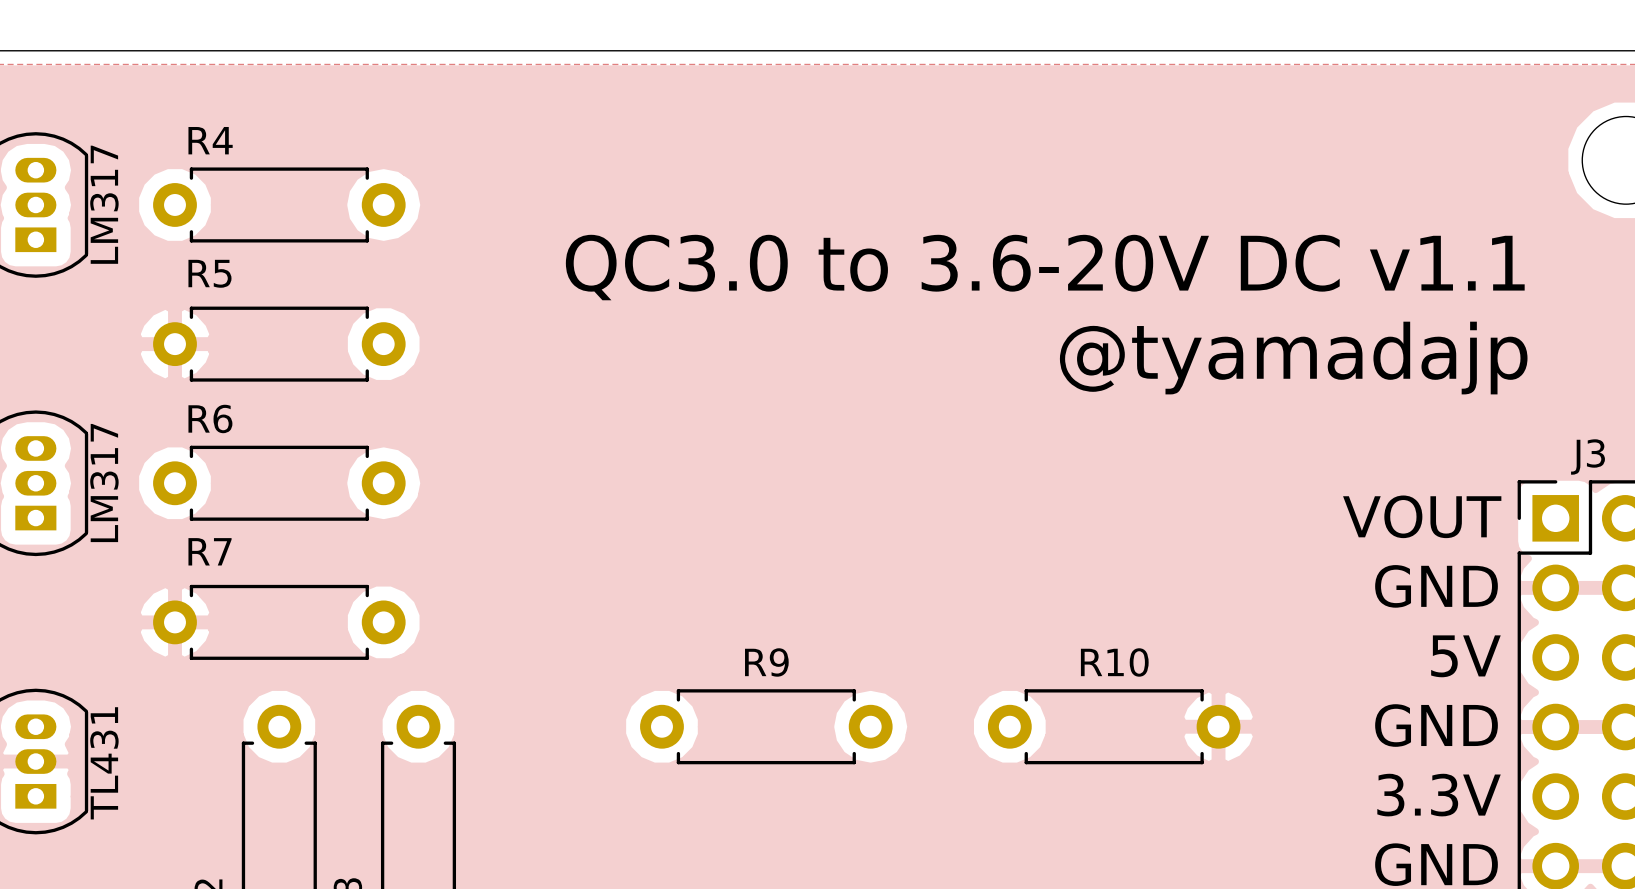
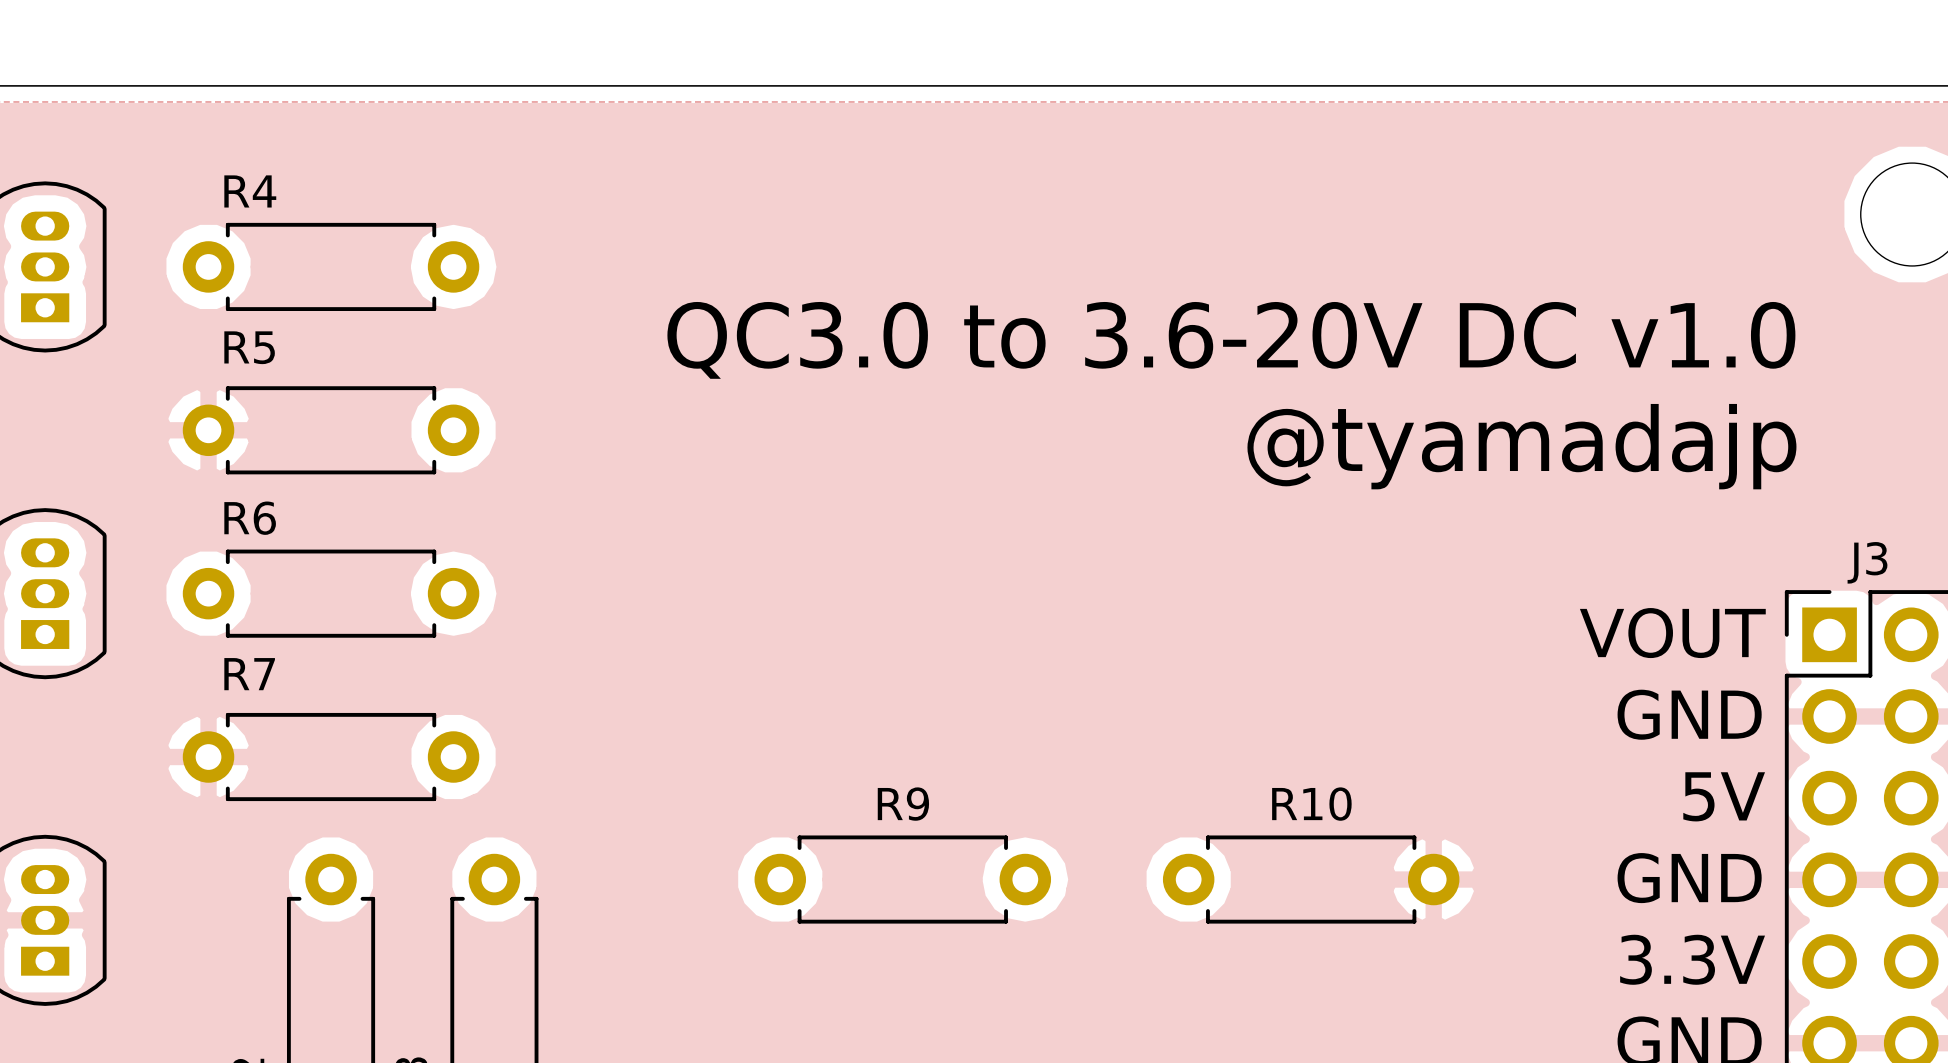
text: LM317 (104, 204) -> none
text: QC3.0 to 3.6-20V DC v1.1 (1045, 267) -> QC3.0 to 3.6-20V DC v1.0 (1231, 340)
text: LM317 (104, 483) -> none
text: TL431 (104, 763) -> none

